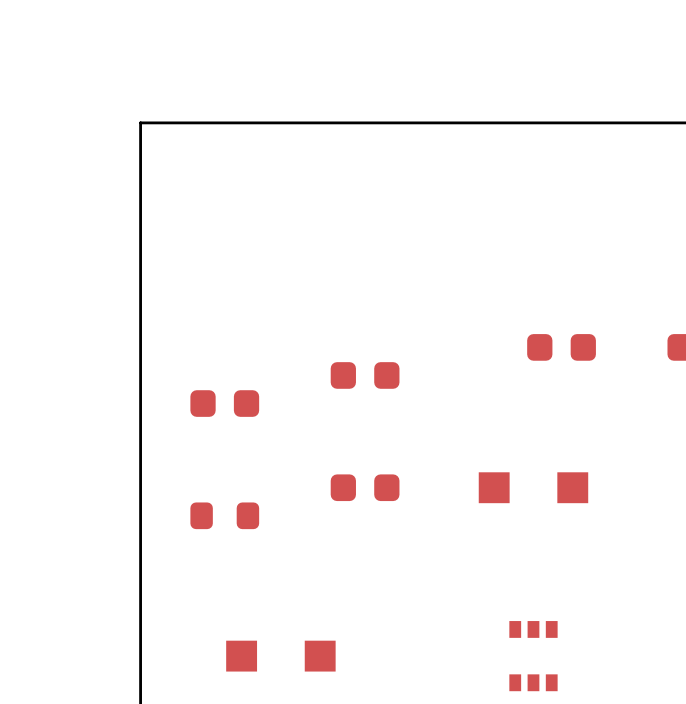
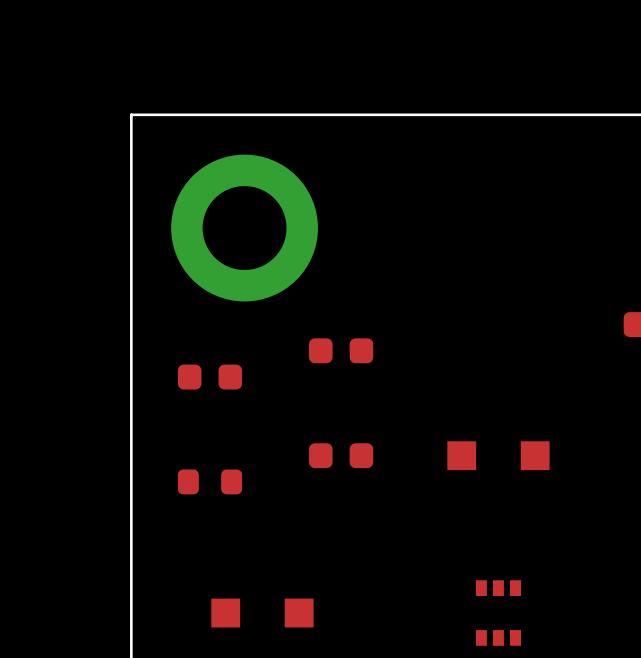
part: none -> (244, 228)
part: (561, 347) -> none

